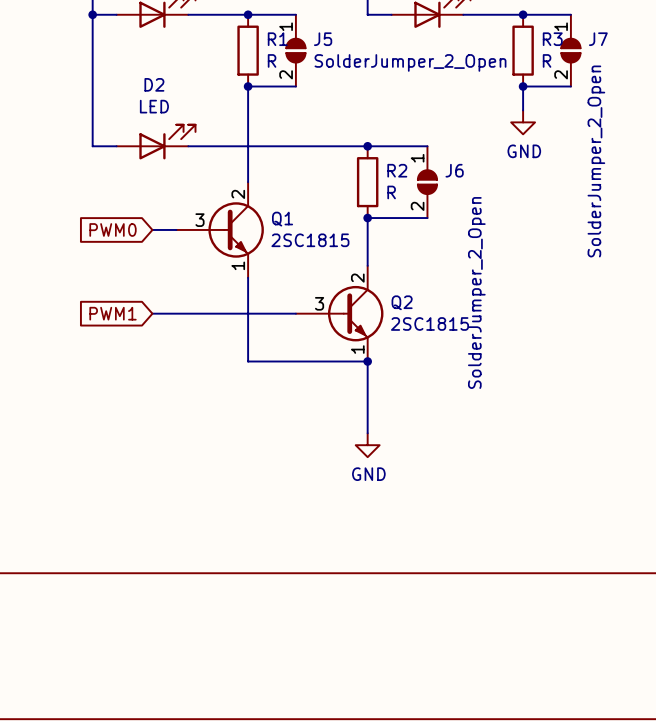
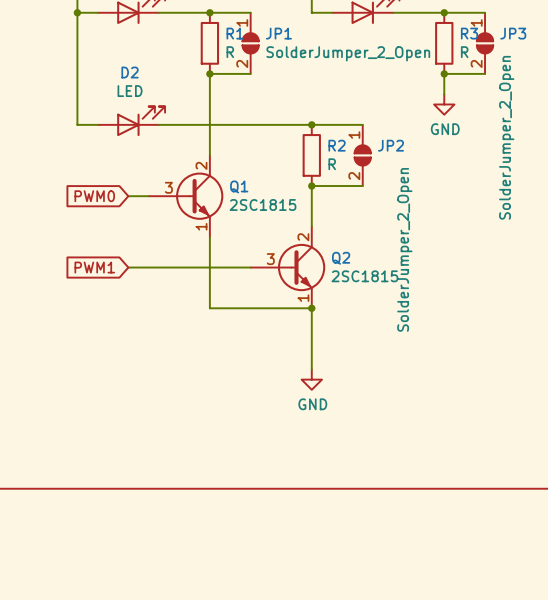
J5 name: J5 (323, 39) -> JP1 (278, 33)
J7 name: J7 (598, 39) -> JP3 (513, 33)
J6 name: J6 (454, 170) -> JP2 (390, 145)

